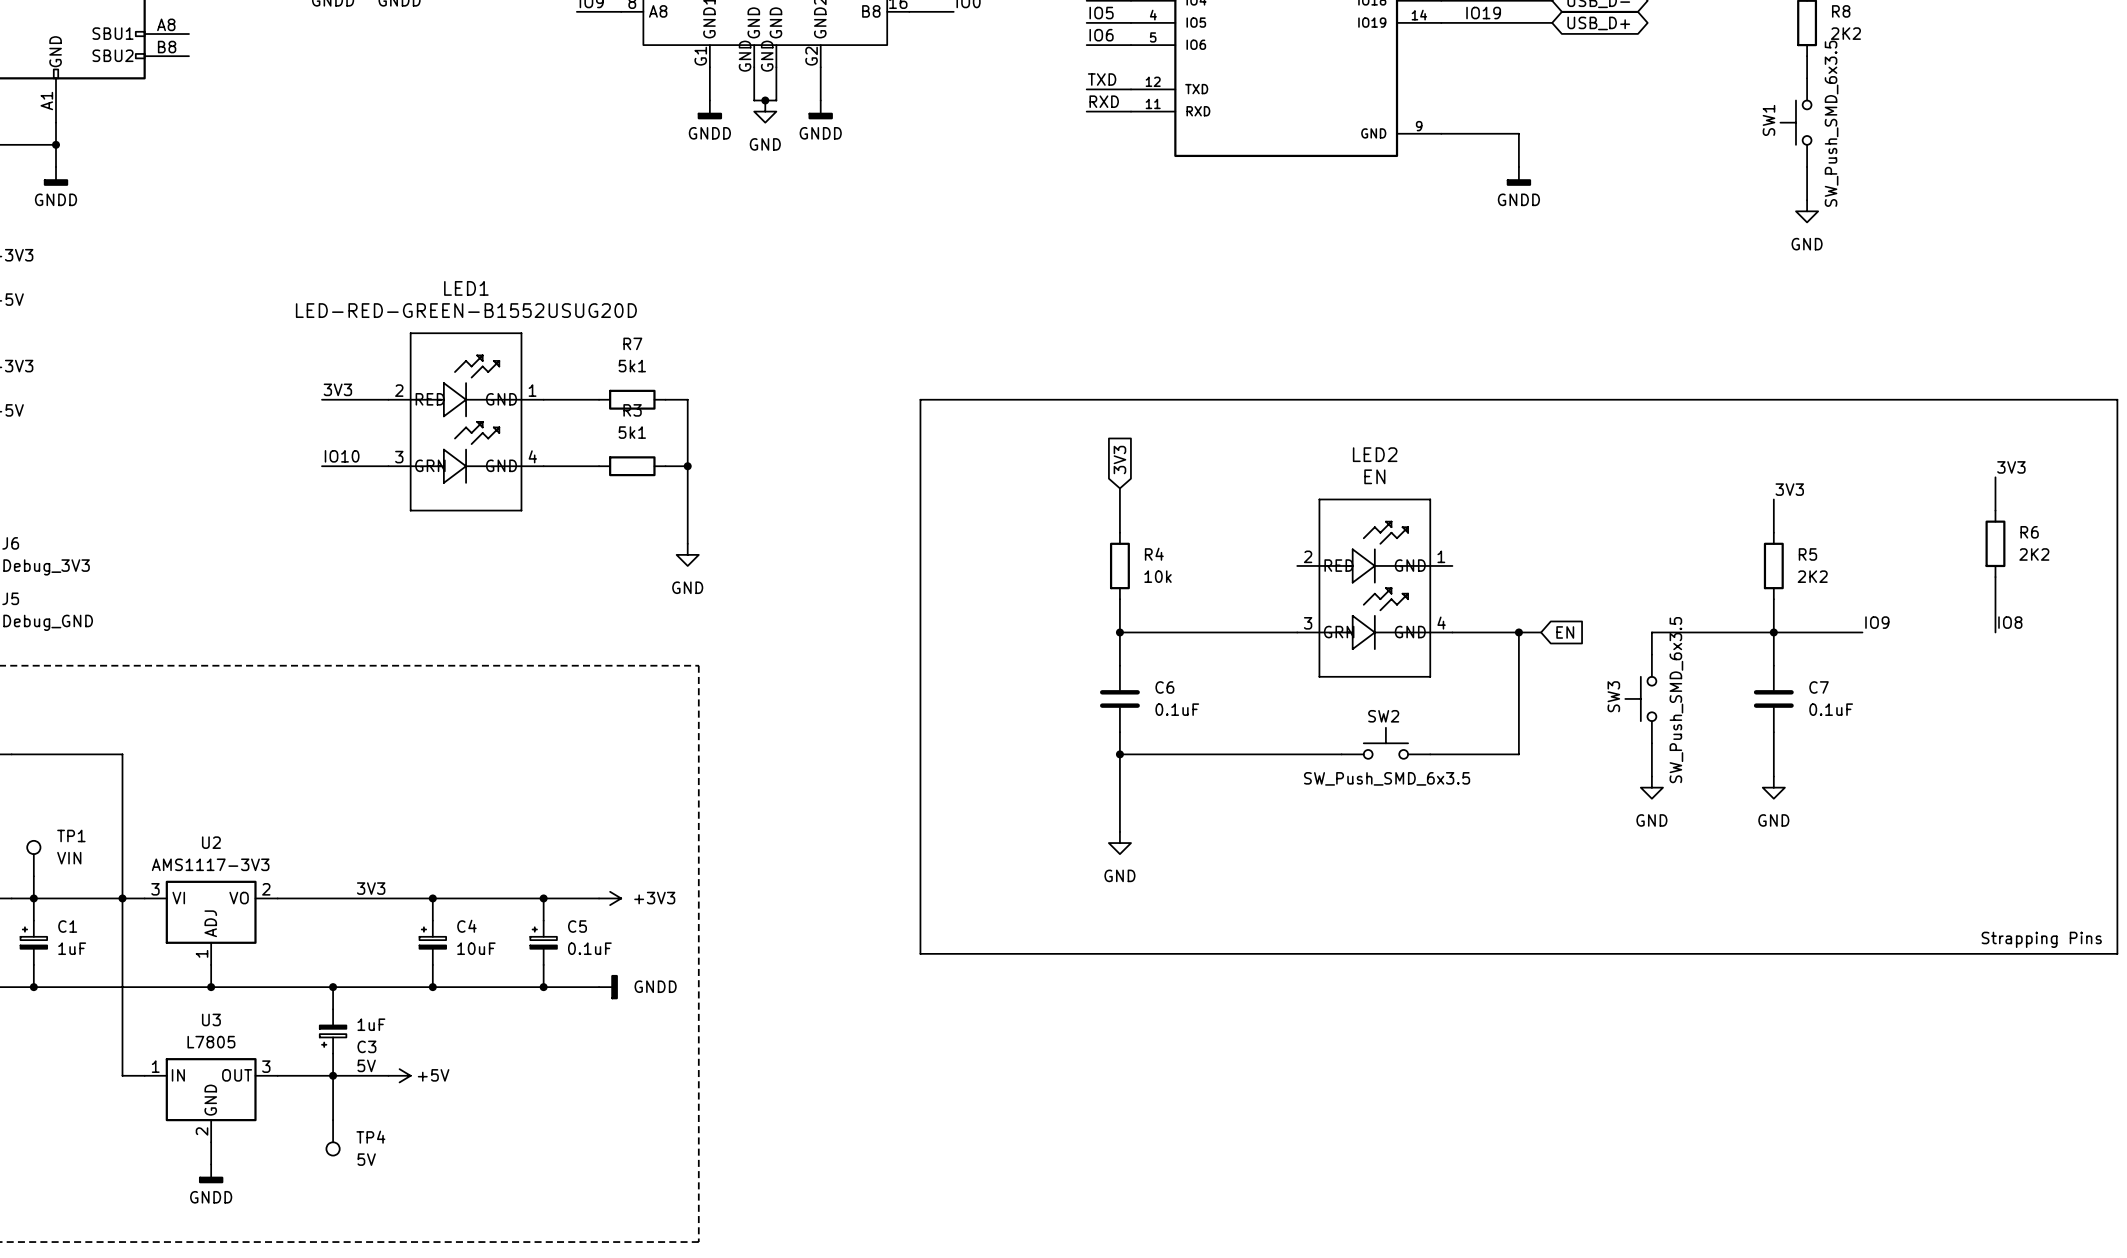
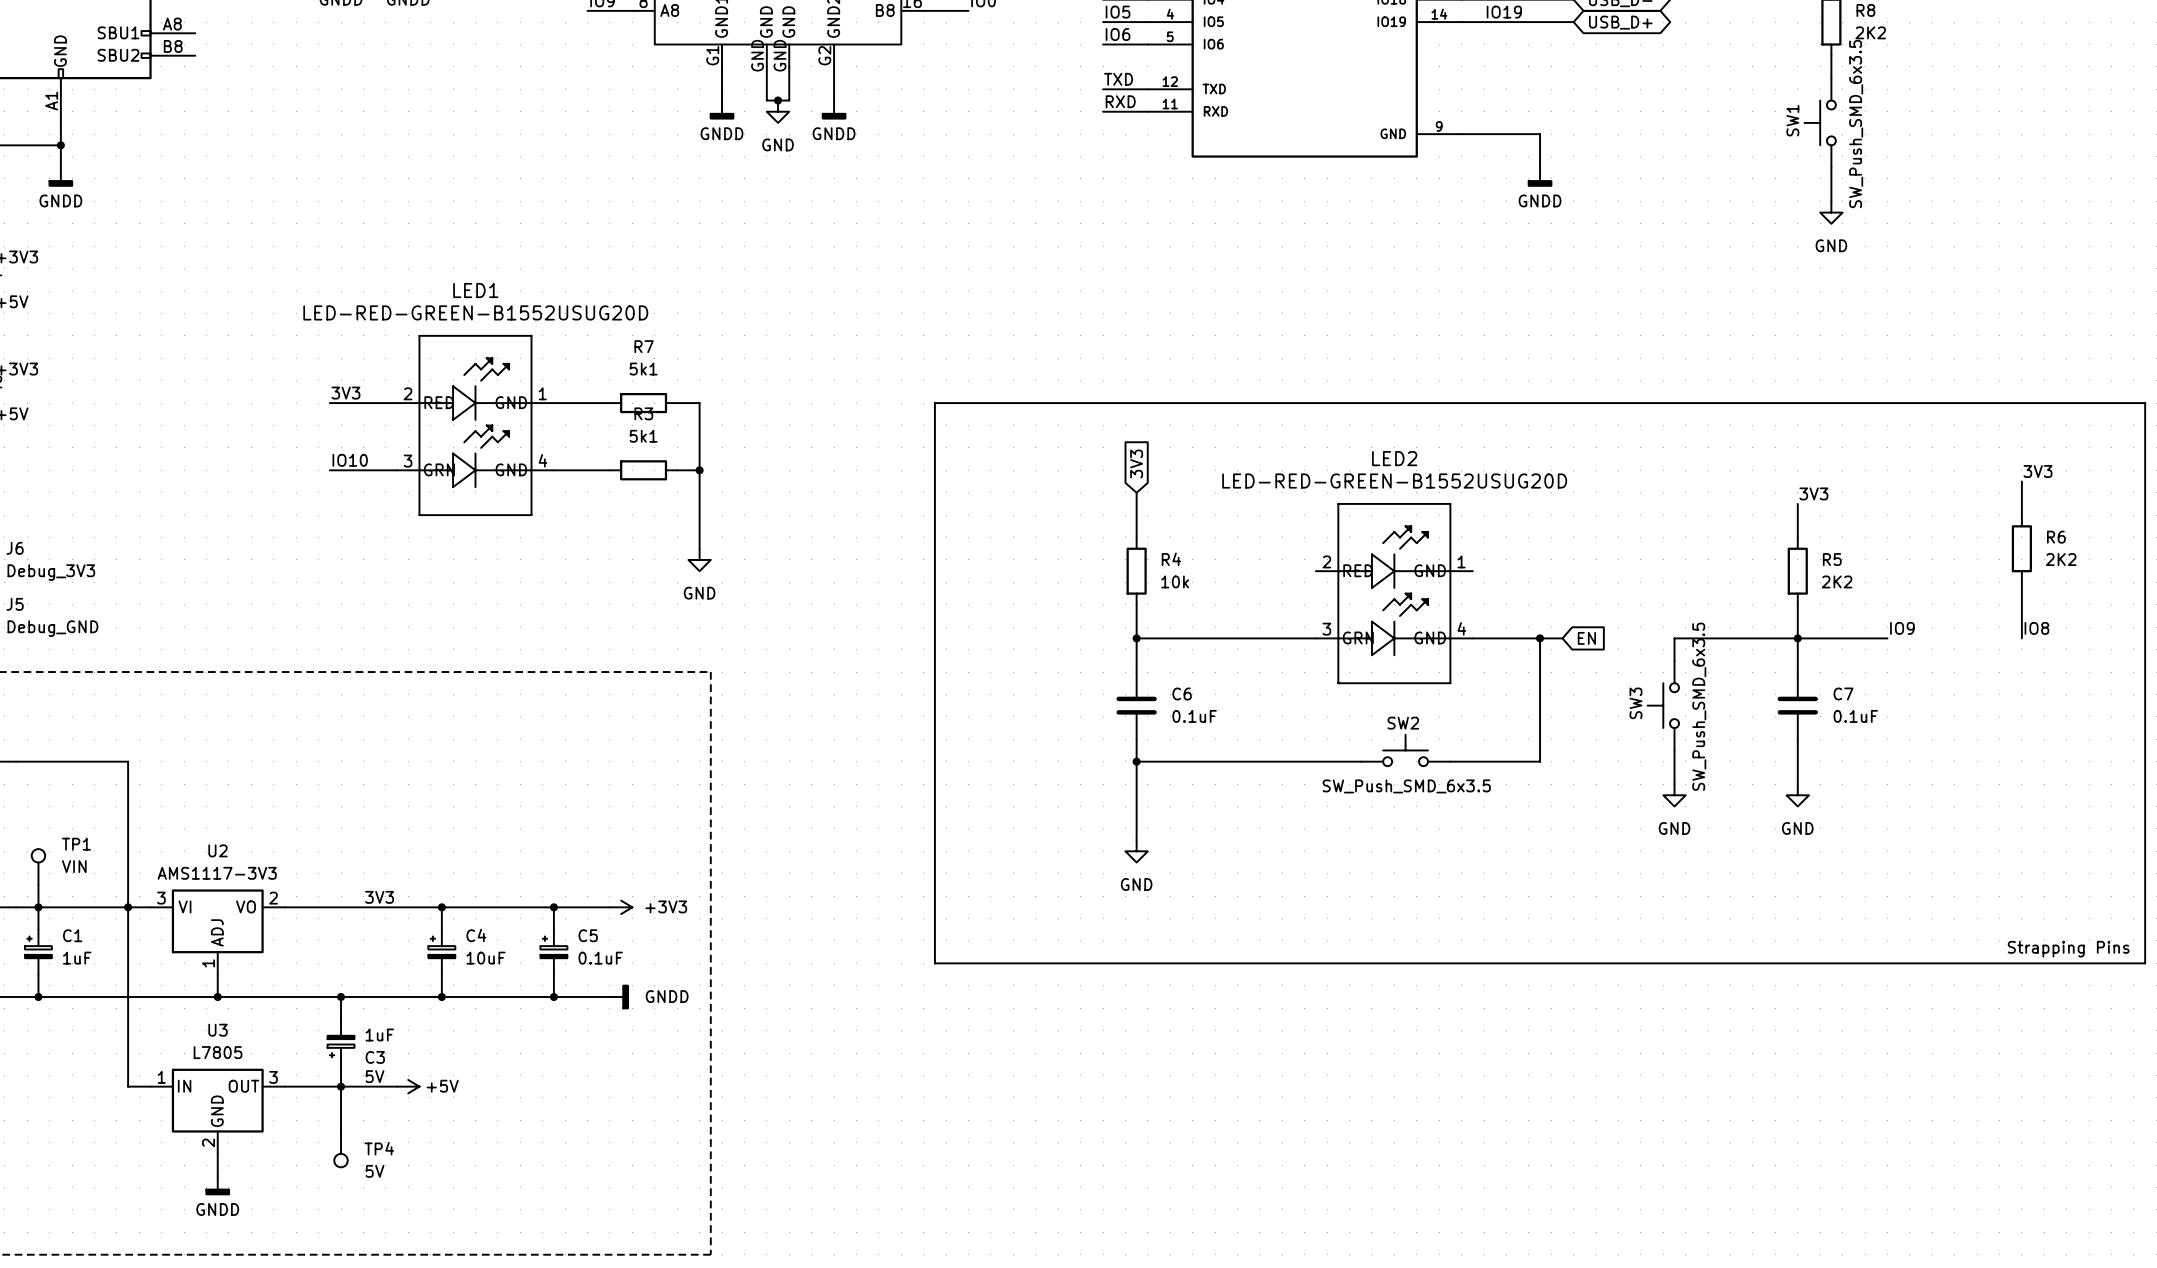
LED2 value: EN (1374, 476) -> LED-RED-GREEN-B1552USUG20D (1394, 481)

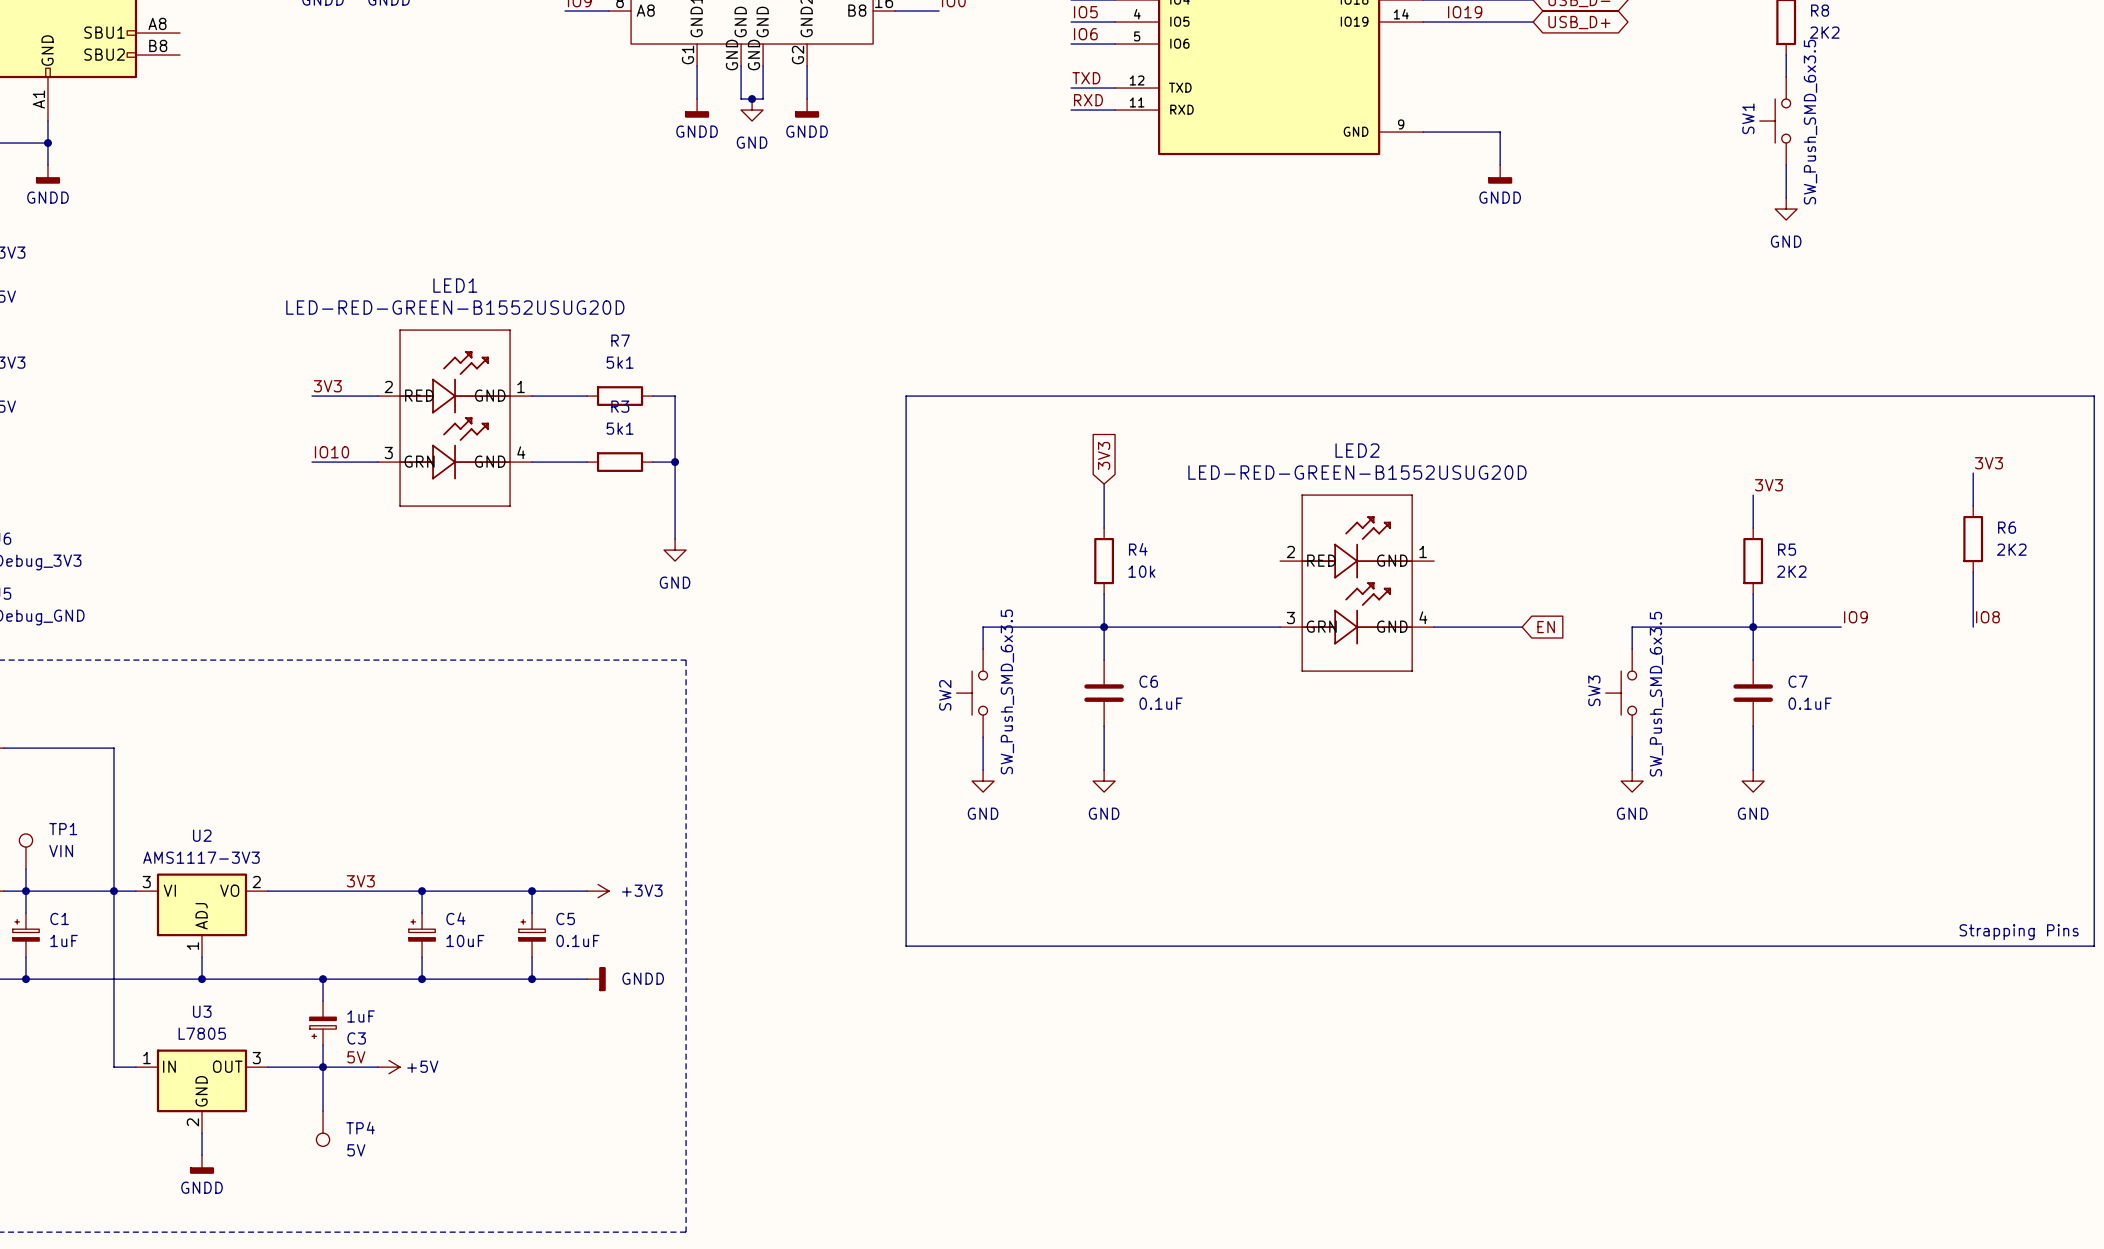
wire: none -> (1104, 627) (983, 627) (983, 649)
wire: (1540, 638) (1540, 761) (1450, 761) -> none
junction: (1540, 638) -> none
wire: none -> (983, 737) (983, 770)
SW2 rotation: 0° (1405, 750) -> 90° counterclockwise (972, 693)
SW2 position: (1405, 750) -> (972, 693)
wire: (1136, 761) (1360, 761) -> none
junction: (1136, 761) -> none
wire: (1136, 784) (1136, 840) -> none
power symbol: none -> GND (983, 781)
power symbol position: GND (1136, 851) -> GND (1104, 781)

